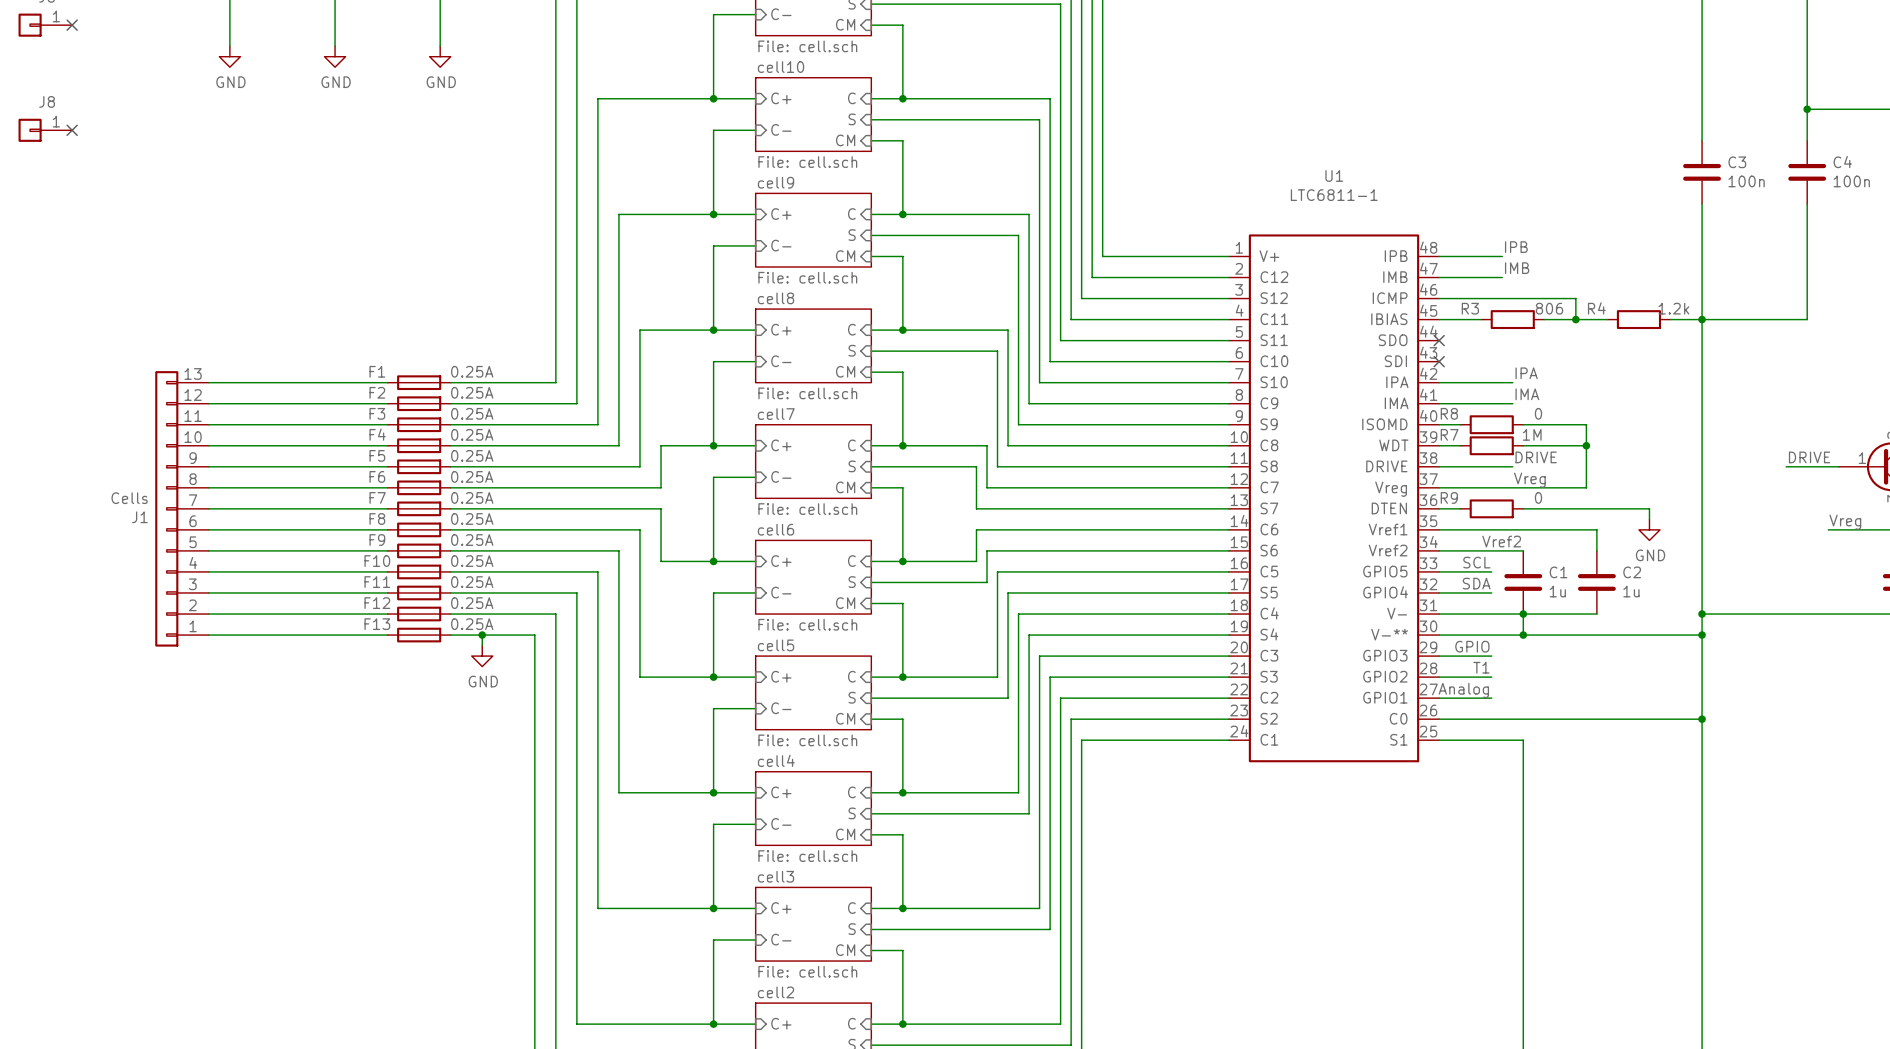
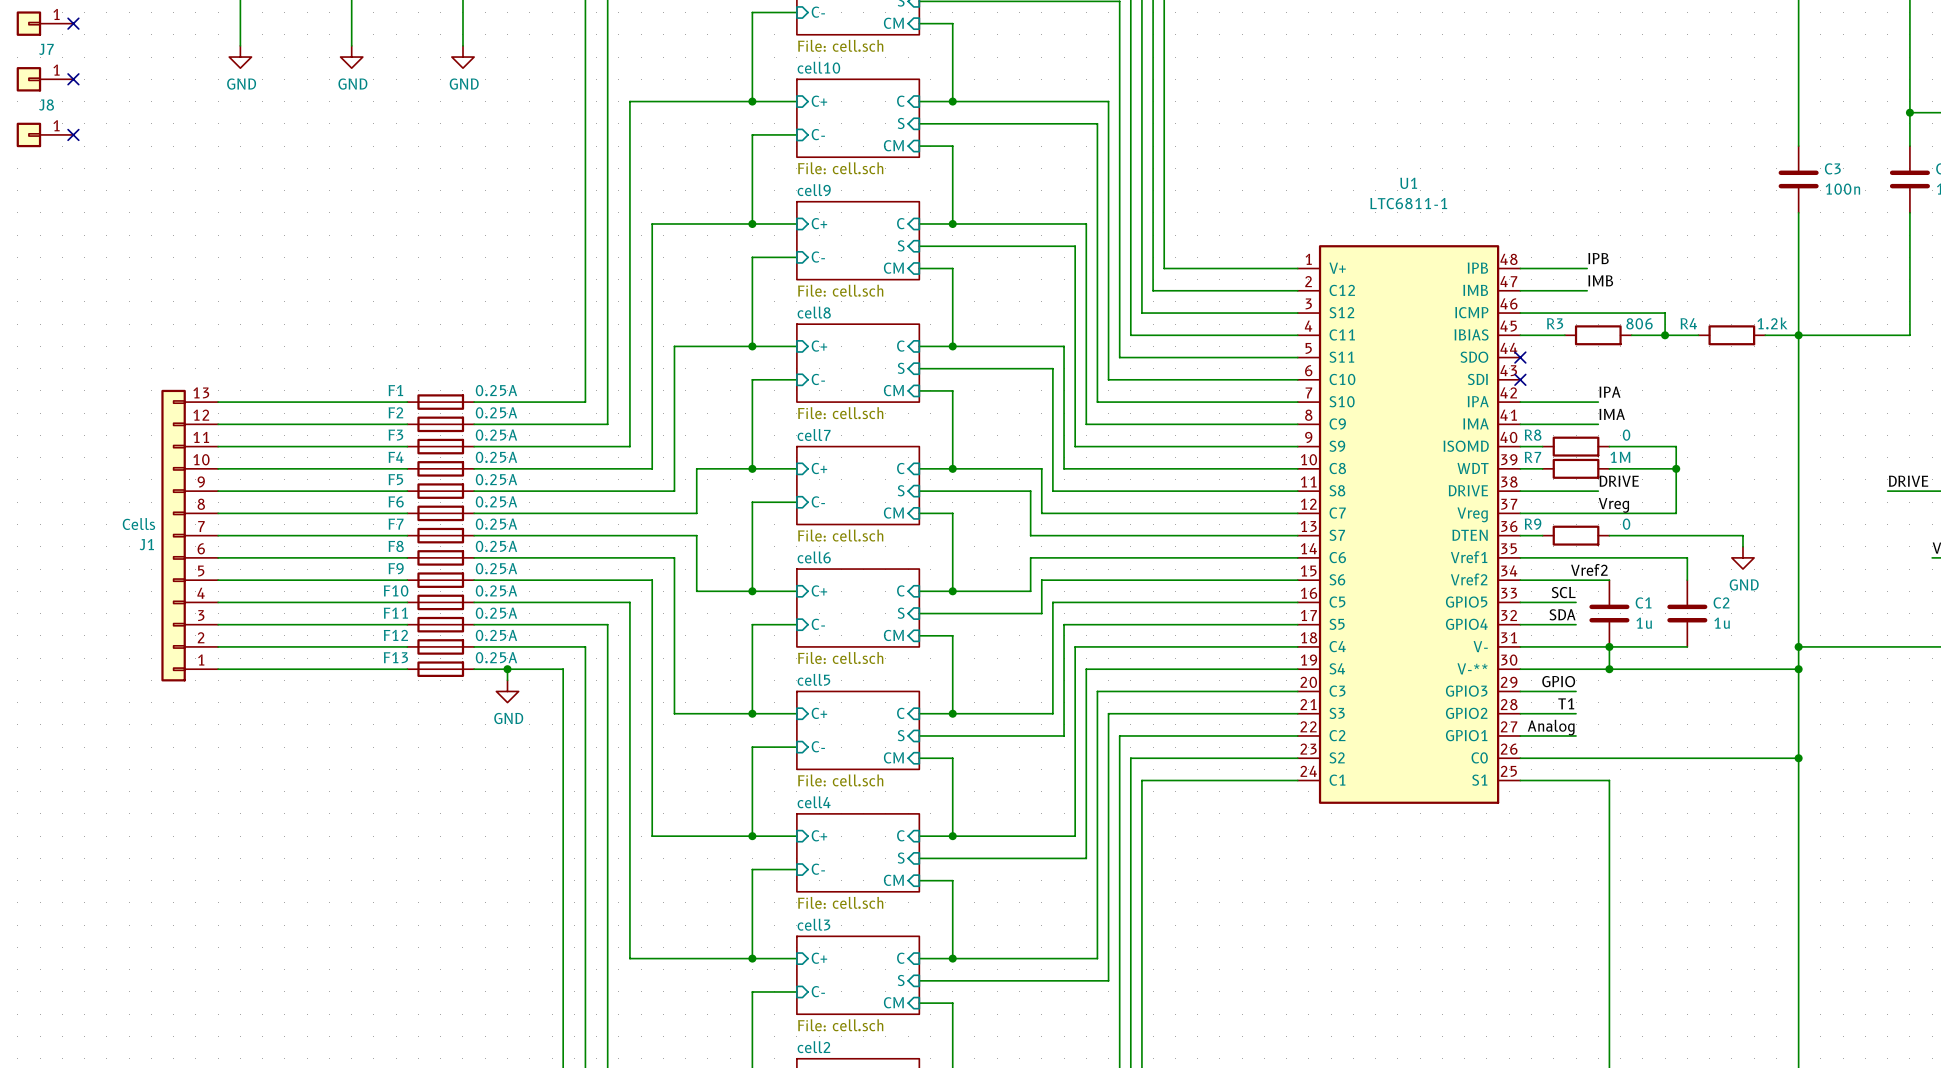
J7: none -> (45, 79)
no-connect mark: none -> (73, 79)

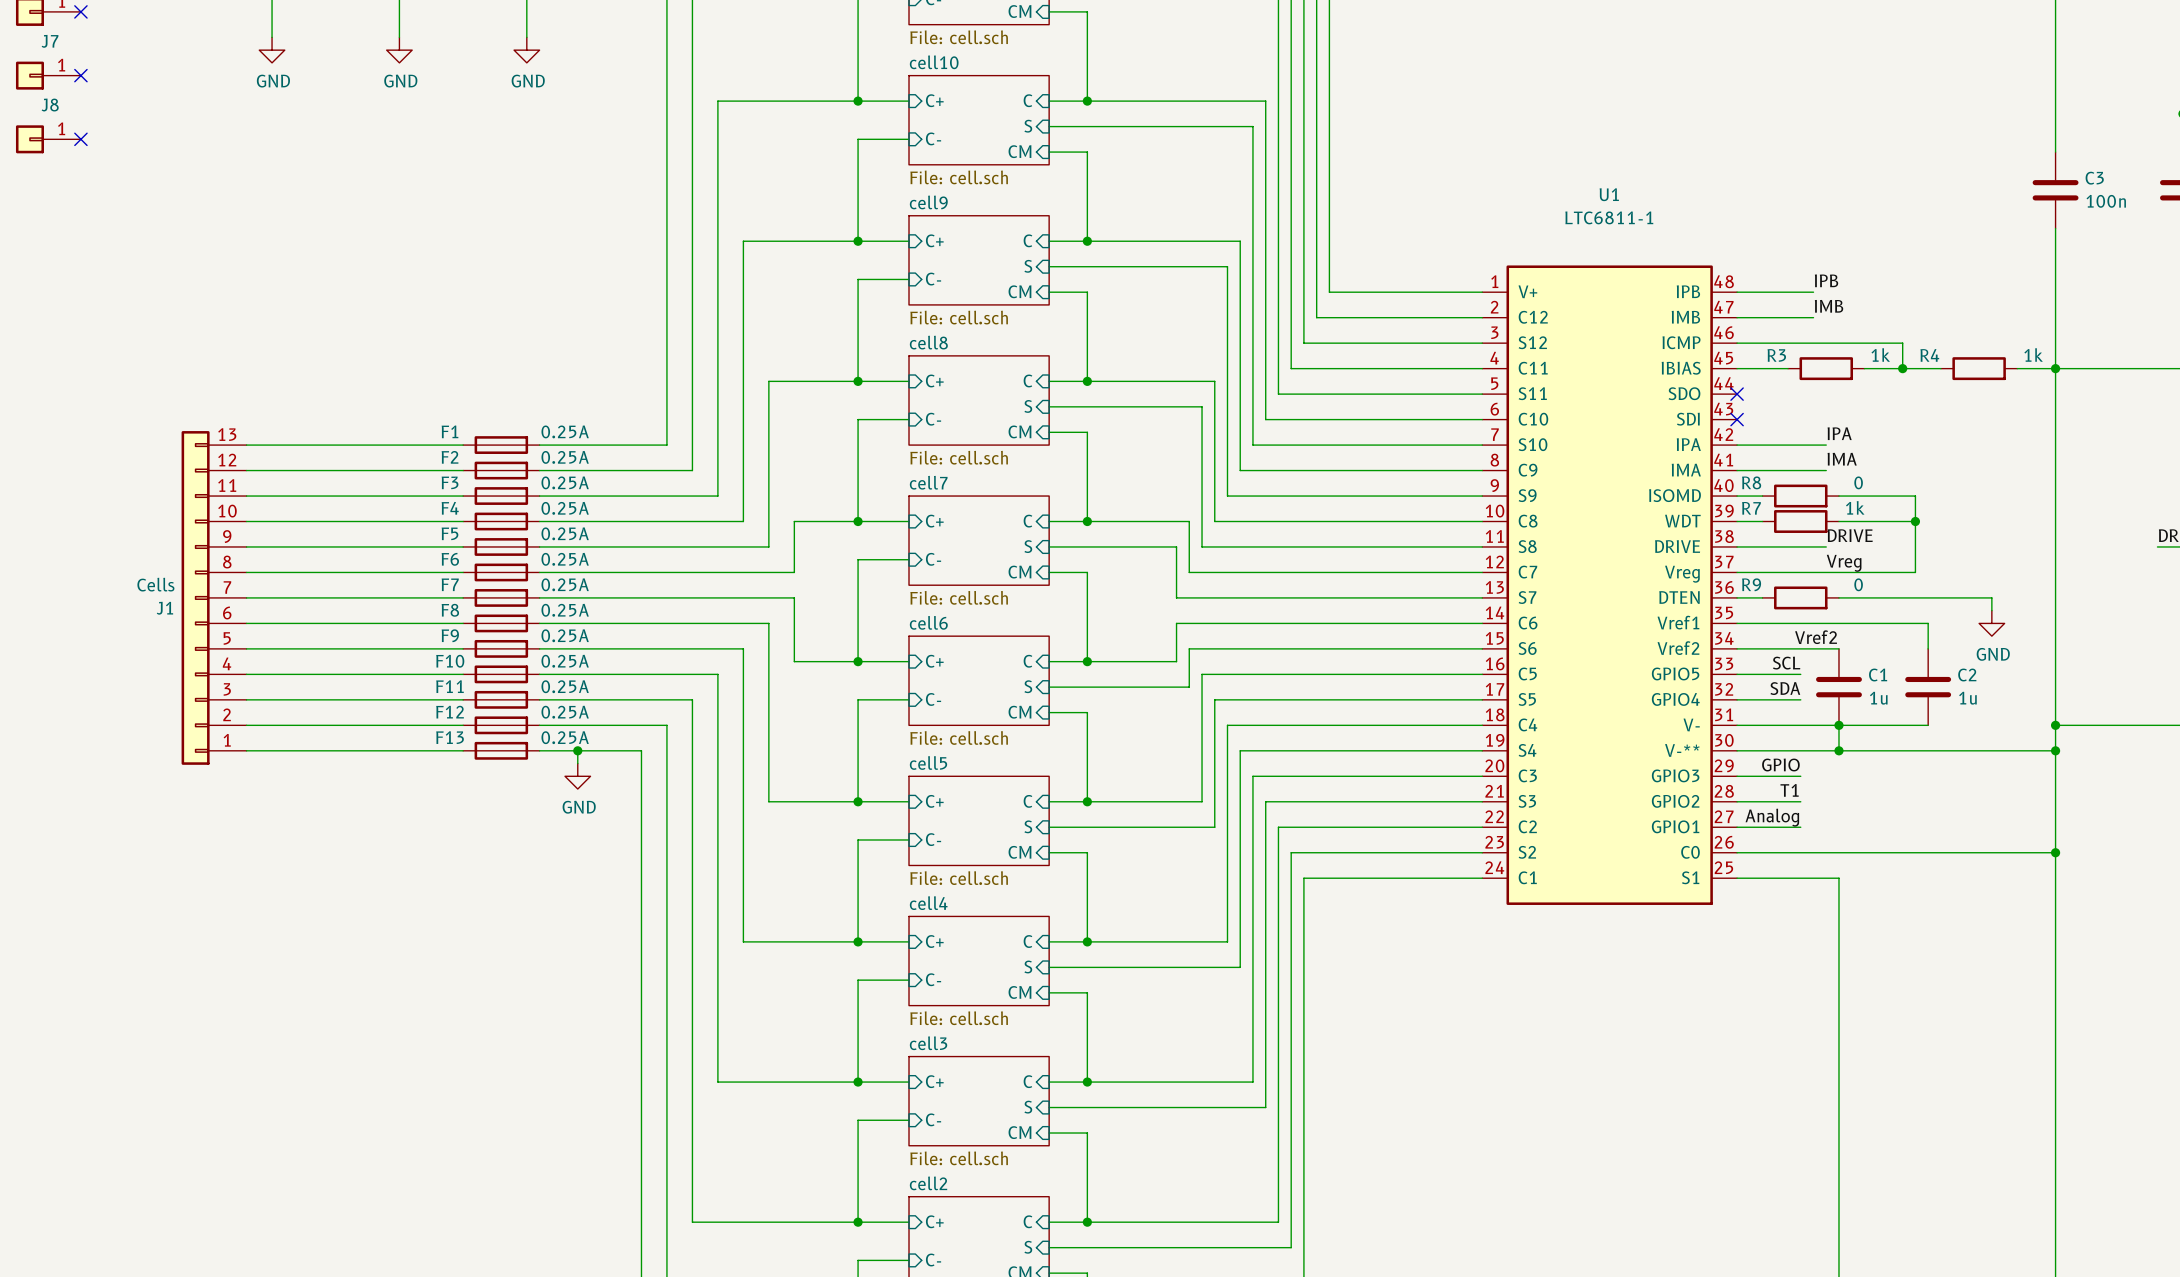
R3 value: 806 (1639, 323) -> 1k (1880, 354)
R4 value: 1.2k (1772, 323) -> 1k (2033, 354)
R7 value: 1M (1620, 457) -> 1k (1855, 507)

